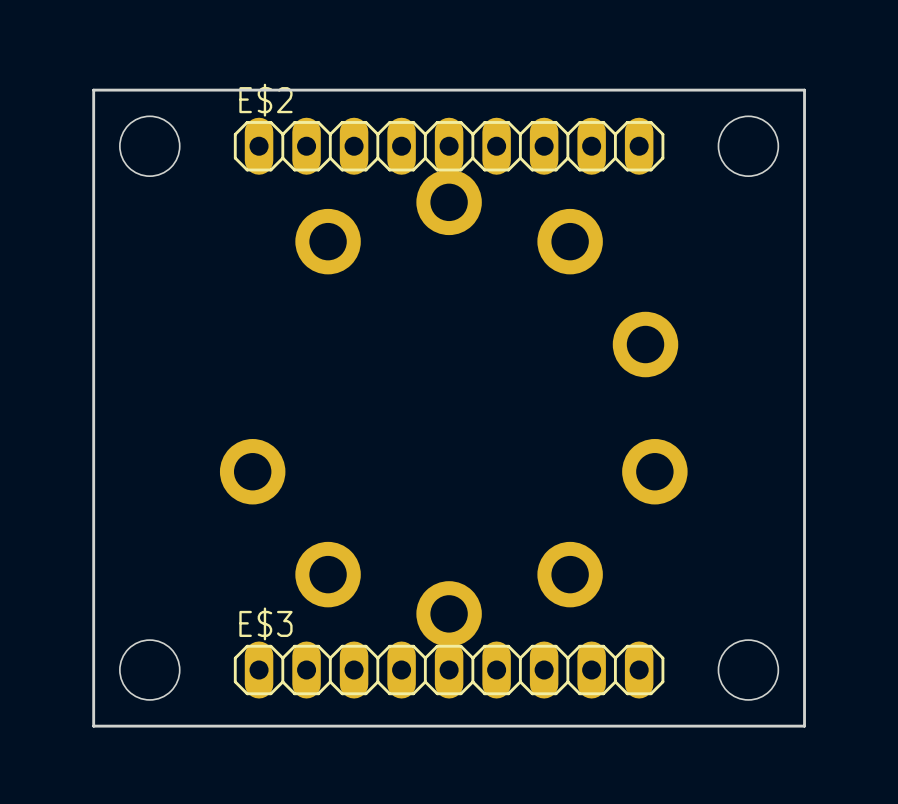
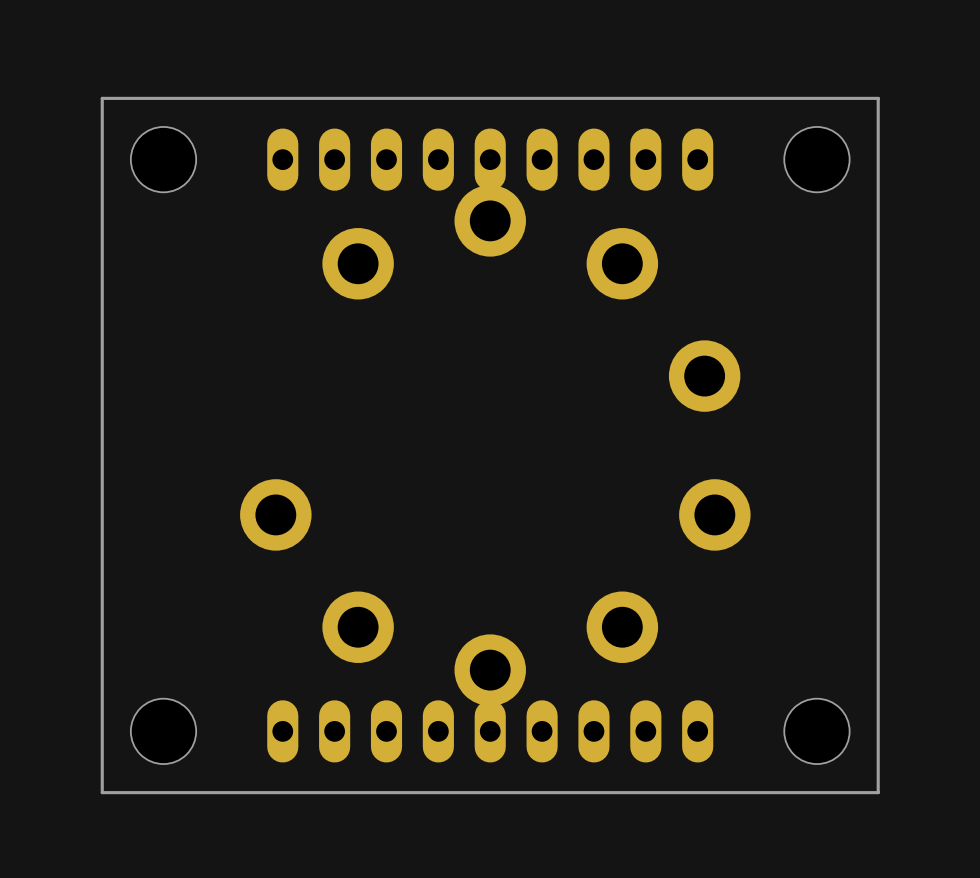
E$2 side: bottom (449, 146) -> top (490, 159)
E$3 side: bottom (449, 670) -> top (490, 731)

